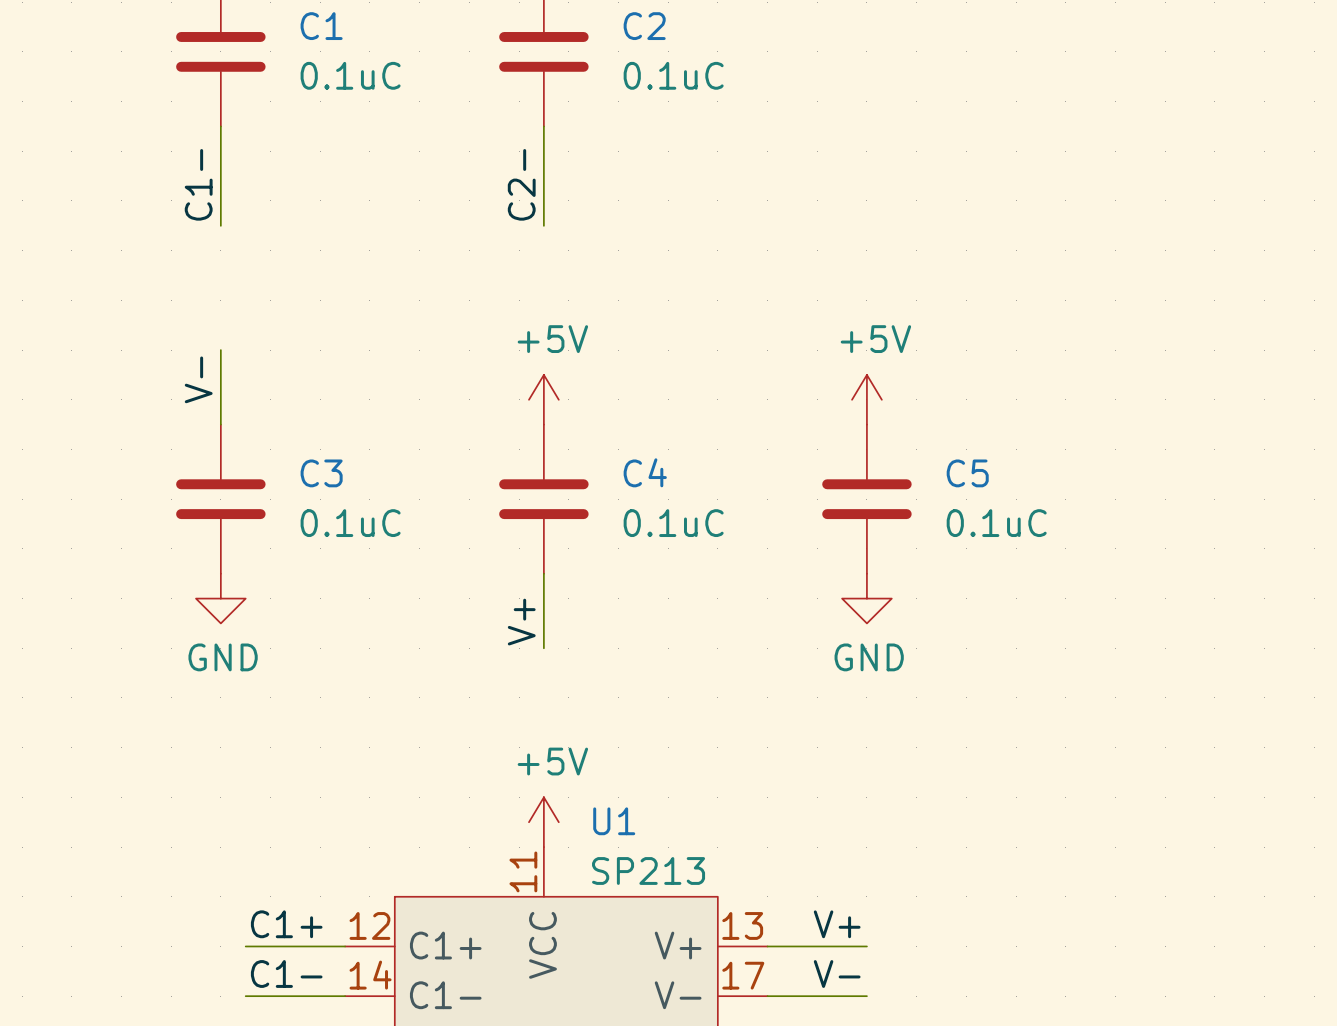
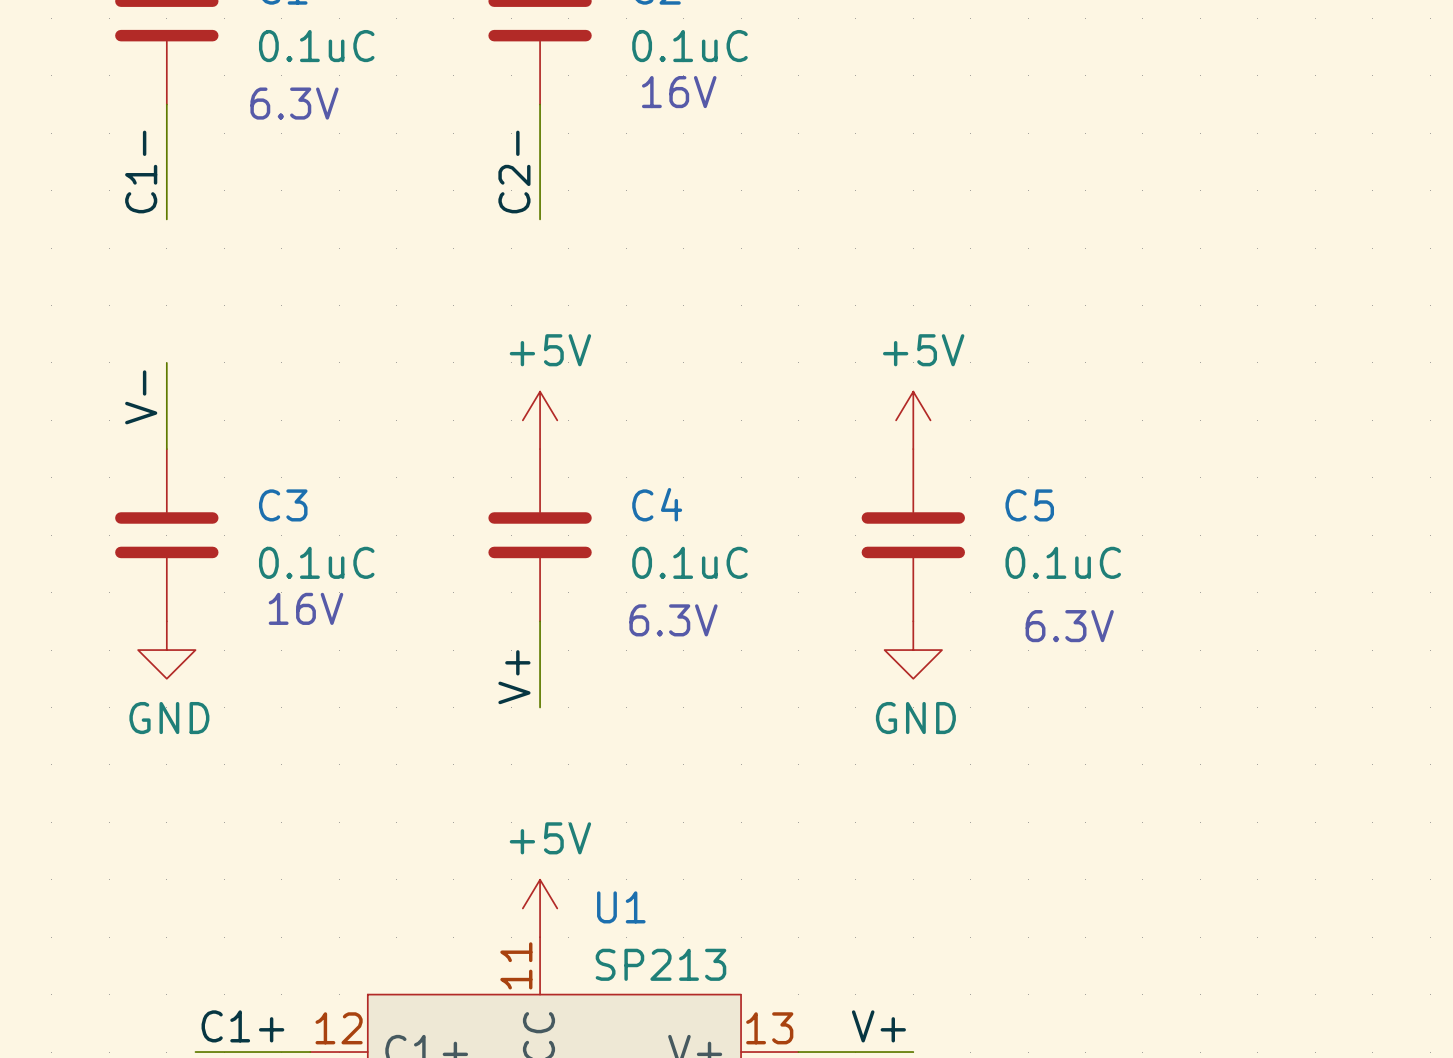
text: none -> 16V (679, 92)
text: none -> 6.3V (294, 103)
text: none -> 16V (306, 608)
text: none -> 6.3V (673, 620)
text: none -> 6.3V (1069, 626)

